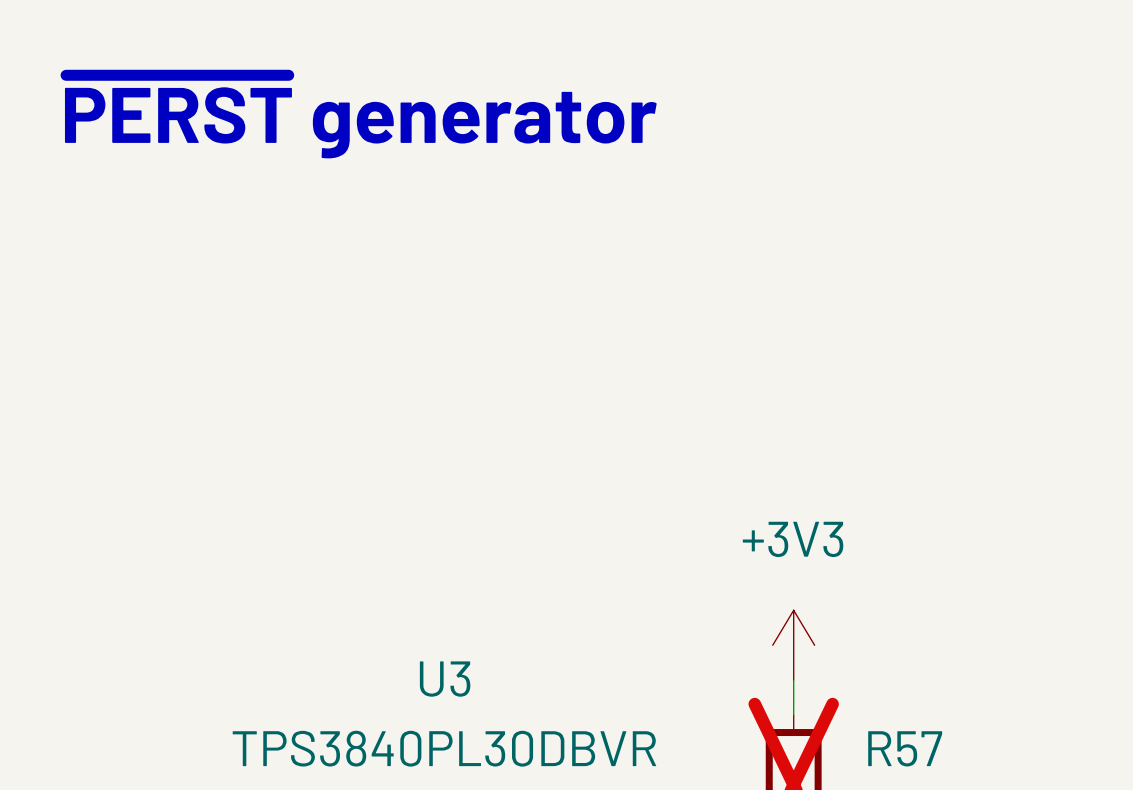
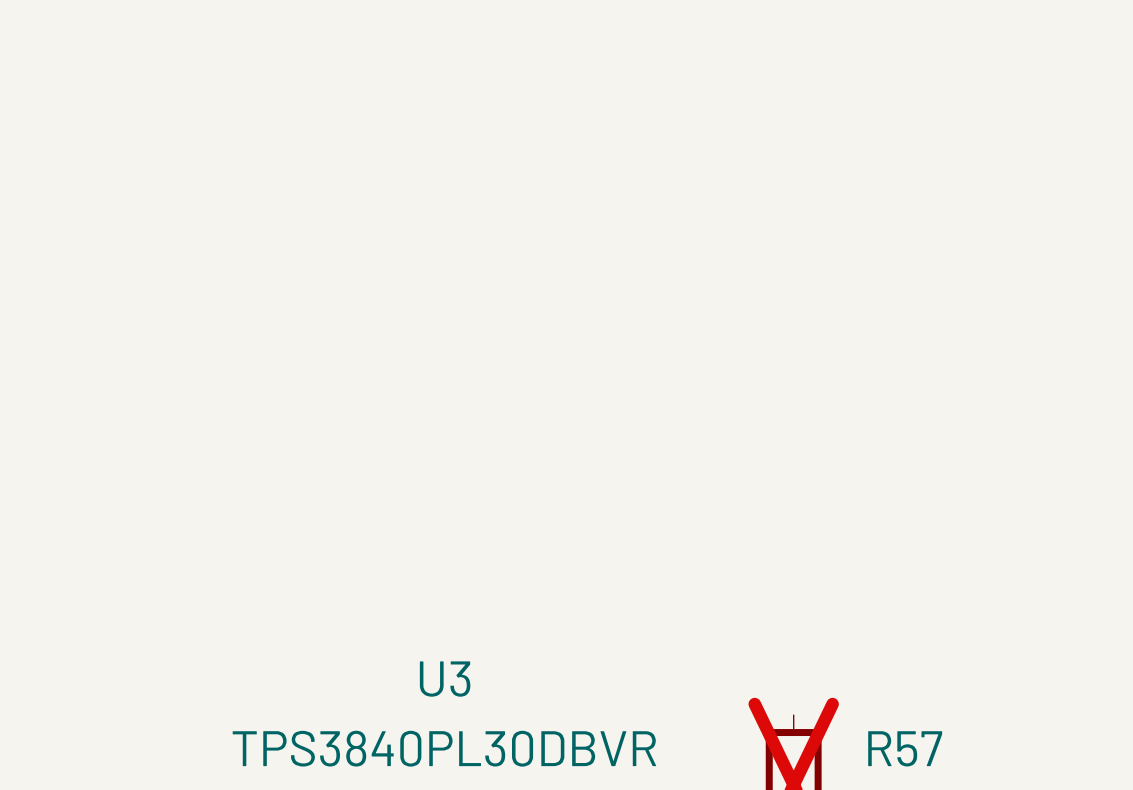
text: ~{PERST} generator (360, 116) -> none
power symbol: +3V3 (793, 645) -> none
wire: (793, 680) (793, 715) -> none

